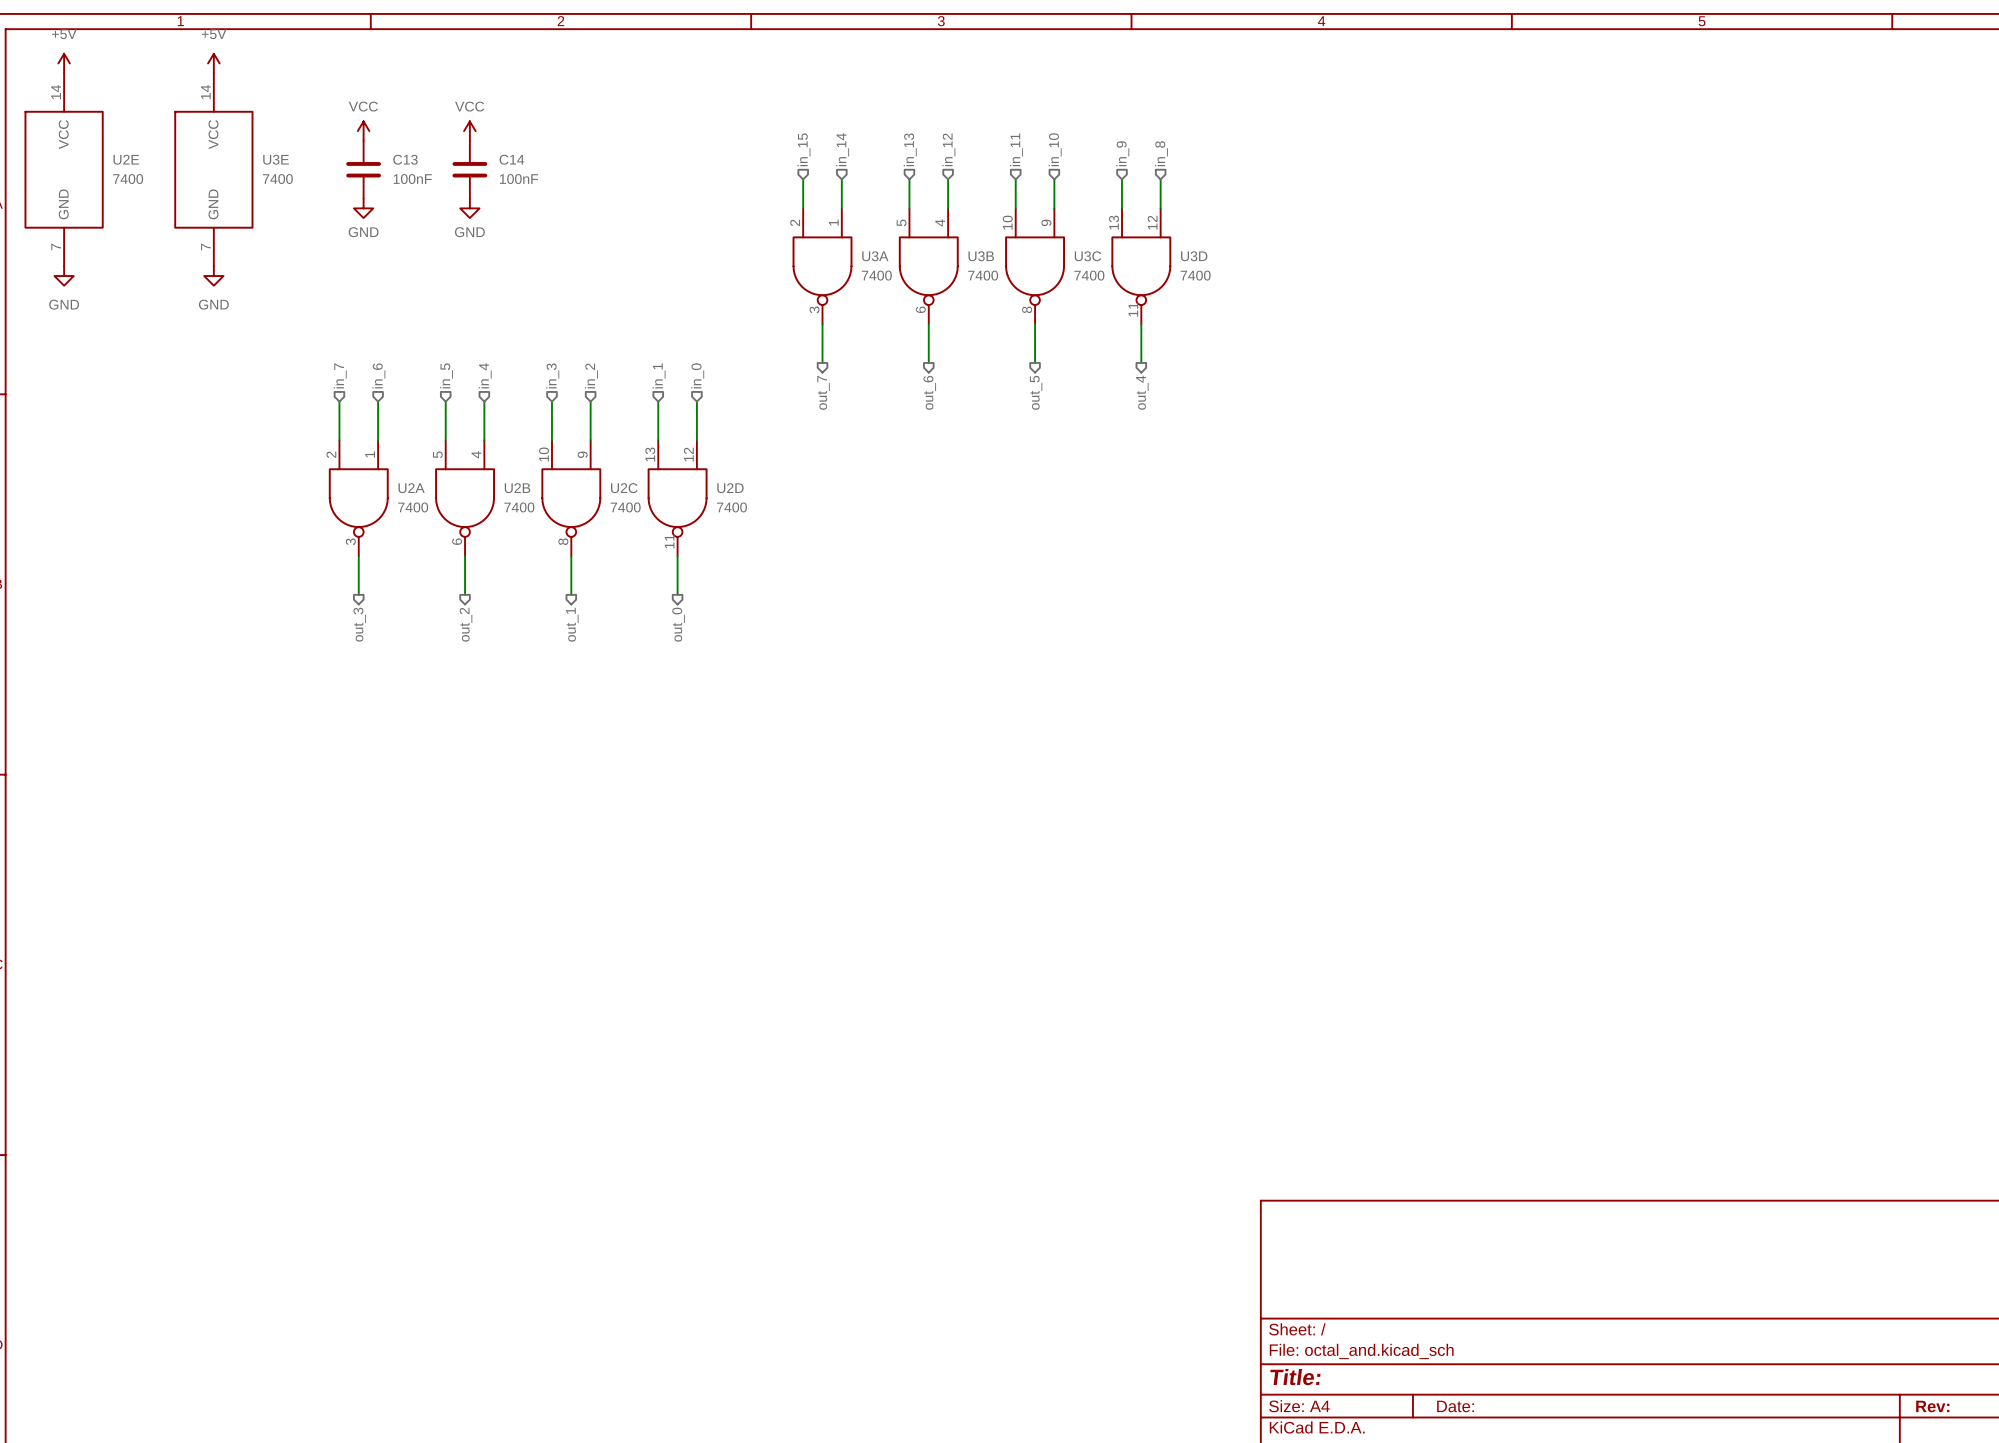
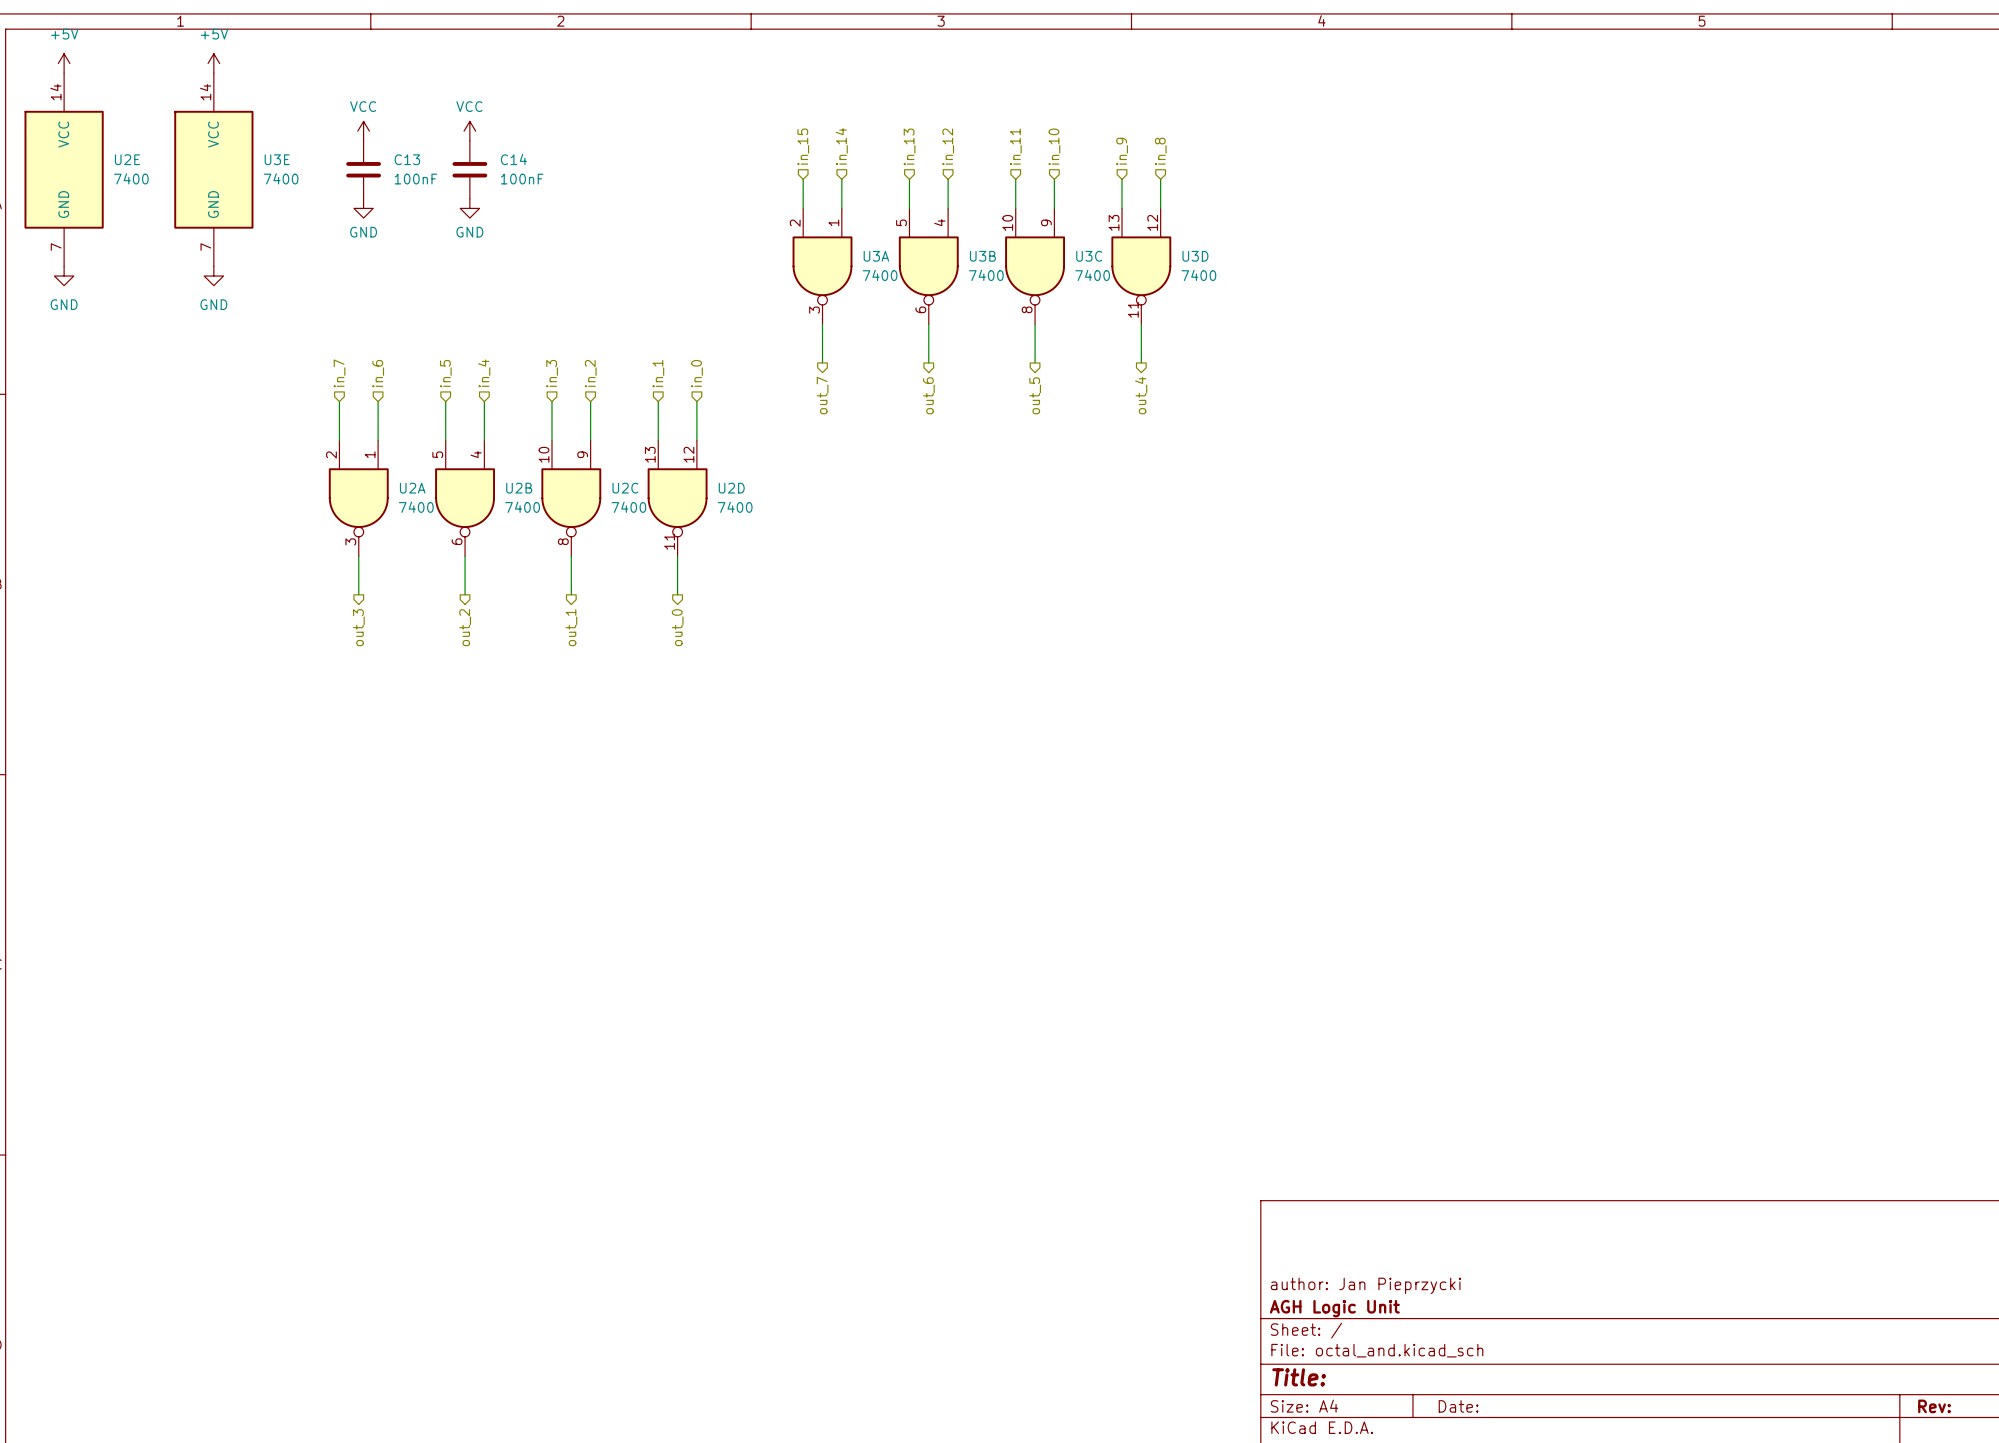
title block: none -> author: Jan Pieprzycki (1365, 1285)
title block: none -> AGH Logic Unit (1334, 1308)

